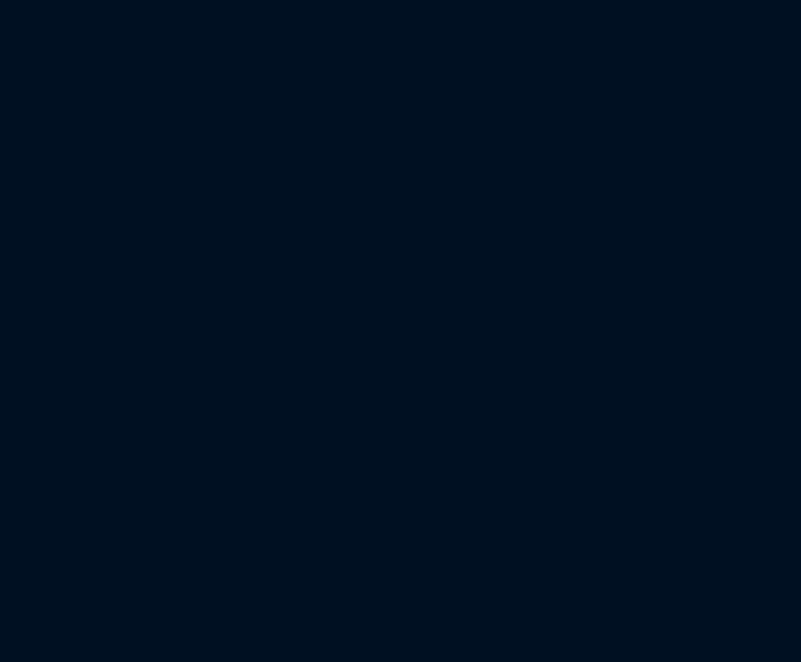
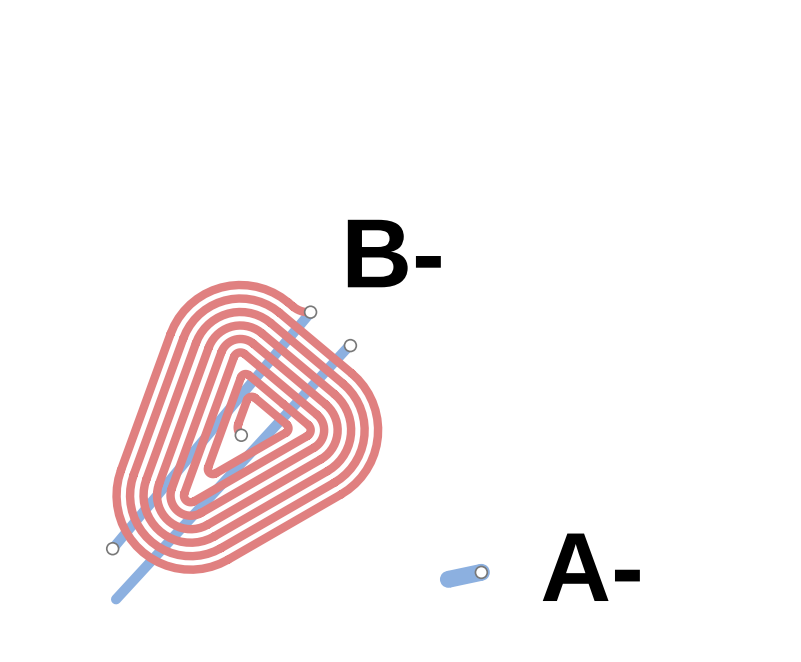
text: none -> B- (394, 253)
top track: none -> (310, 312) (297, 309) (280, 297) (264, 289) (238, 285) (221, 287) (204, 294) (190, 304) (178, 317) (170, 333) (121, 470) (116, 487) (117, 505) (121, 523) (130, 539) (143, 552) (158, 562) (184, 569) (202, 568) (227, 559) (341, 494) (355, 483) (366, 470) (374, 454) (378, 427) (372, 401) (358, 379) (273, 308) (253, 299) (239, 298) (224, 300) (211, 305) (194, 319) (186, 331) (131, 481) (130, 496) (134, 518) (141, 531) (151, 542) (164, 550) (185, 555) (207, 553) (221, 548) (340, 478) (350, 468) (358, 456) (363, 442) (364, 428) (360, 406) (348, 388) (270, 323) (261, 316) (244, 312) (233, 312) (217, 317) (208, 324) (198, 337) (144, 484) (143, 496) (146, 513) (160, 531) (170, 537) (186, 542) (203, 540) (214, 536) (332, 467) (346, 450) (351, 428) (347, 412) (338, 397) (262, 333) (243, 325) (224, 329) (214, 337) (208, 347) (157, 487) (158, 504) (169, 521) (187, 529) (207, 524) (324, 457) (334, 444) (337, 429) (335, 417) (328, 407) (253, 343) (242, 339) (230, 341) (221, 352) (171, 488) (171, 500) (177, 510) (188, 515) (200, 513) (316, 446) (322, 438) (324, 429) (322, 422) (316, 414) (244, 354) (237, 353) (234, 356) (184, 493) (186, 500) (194, 501) (307, 435) (310, 429) (308, 424) (245, 374) (240, 377) (208, 467) (209, 472) (215, 473) (285, 432) (288, 427) (255, 397) (251, 396) (247, 399) (237, 425) (241, 435)
via: none -> (310, 312)
bottom track: none -> (310, 313) (310, 312) (112, 548)
via: none -> (350, 345)
bottom track: none -> (348, 346) (116, 599)
via: none -> (241, 435)
via: none -> (112, 548)
text: none -> A- (591, 567)
via: none -> (481, 572)
part: none -> (464, 575)

